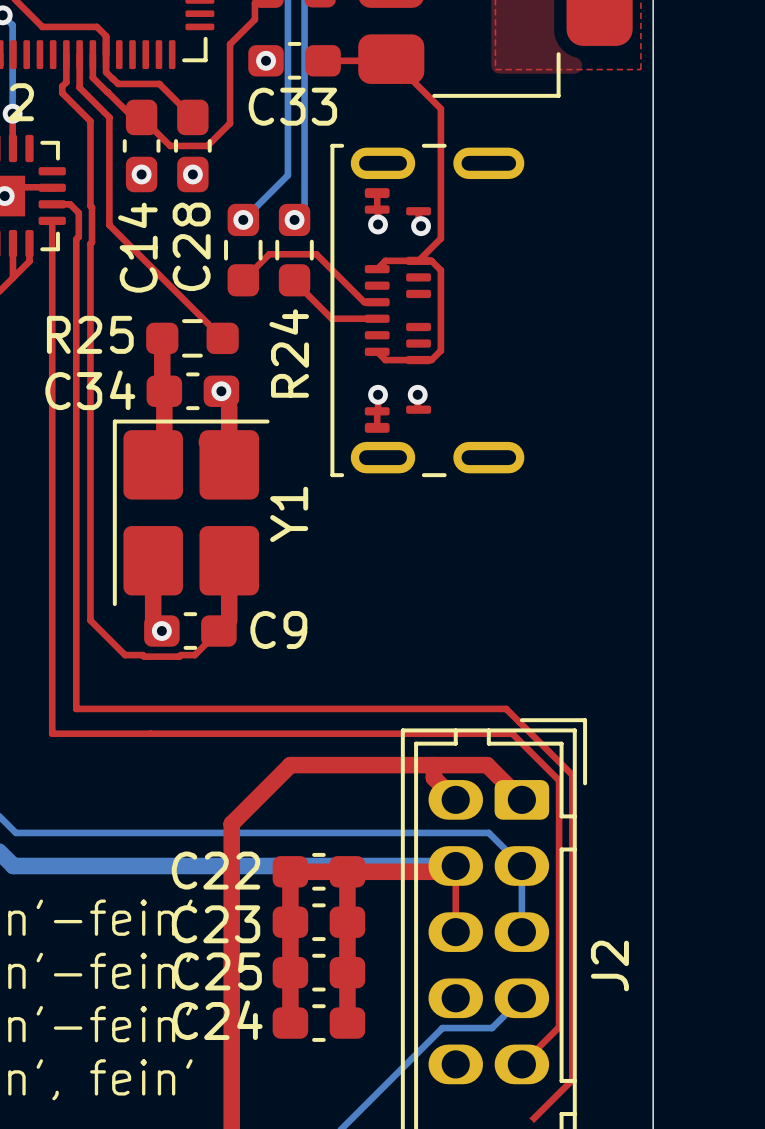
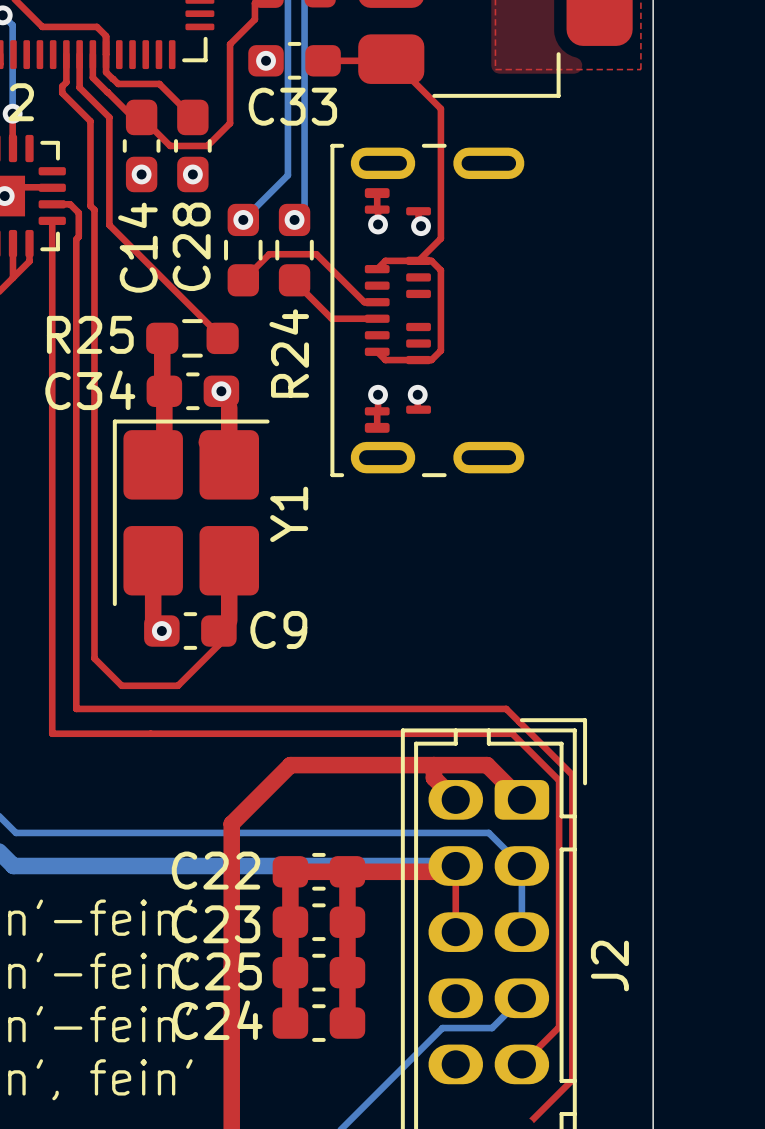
top track: (92, 207) (90, 620) (125, 655) (144, 656) (194, 655) (218, 631) -> (92, 207) (94, 209) (94, 658) (121, 685) (177, 685) (218, 644) (218, 631)

